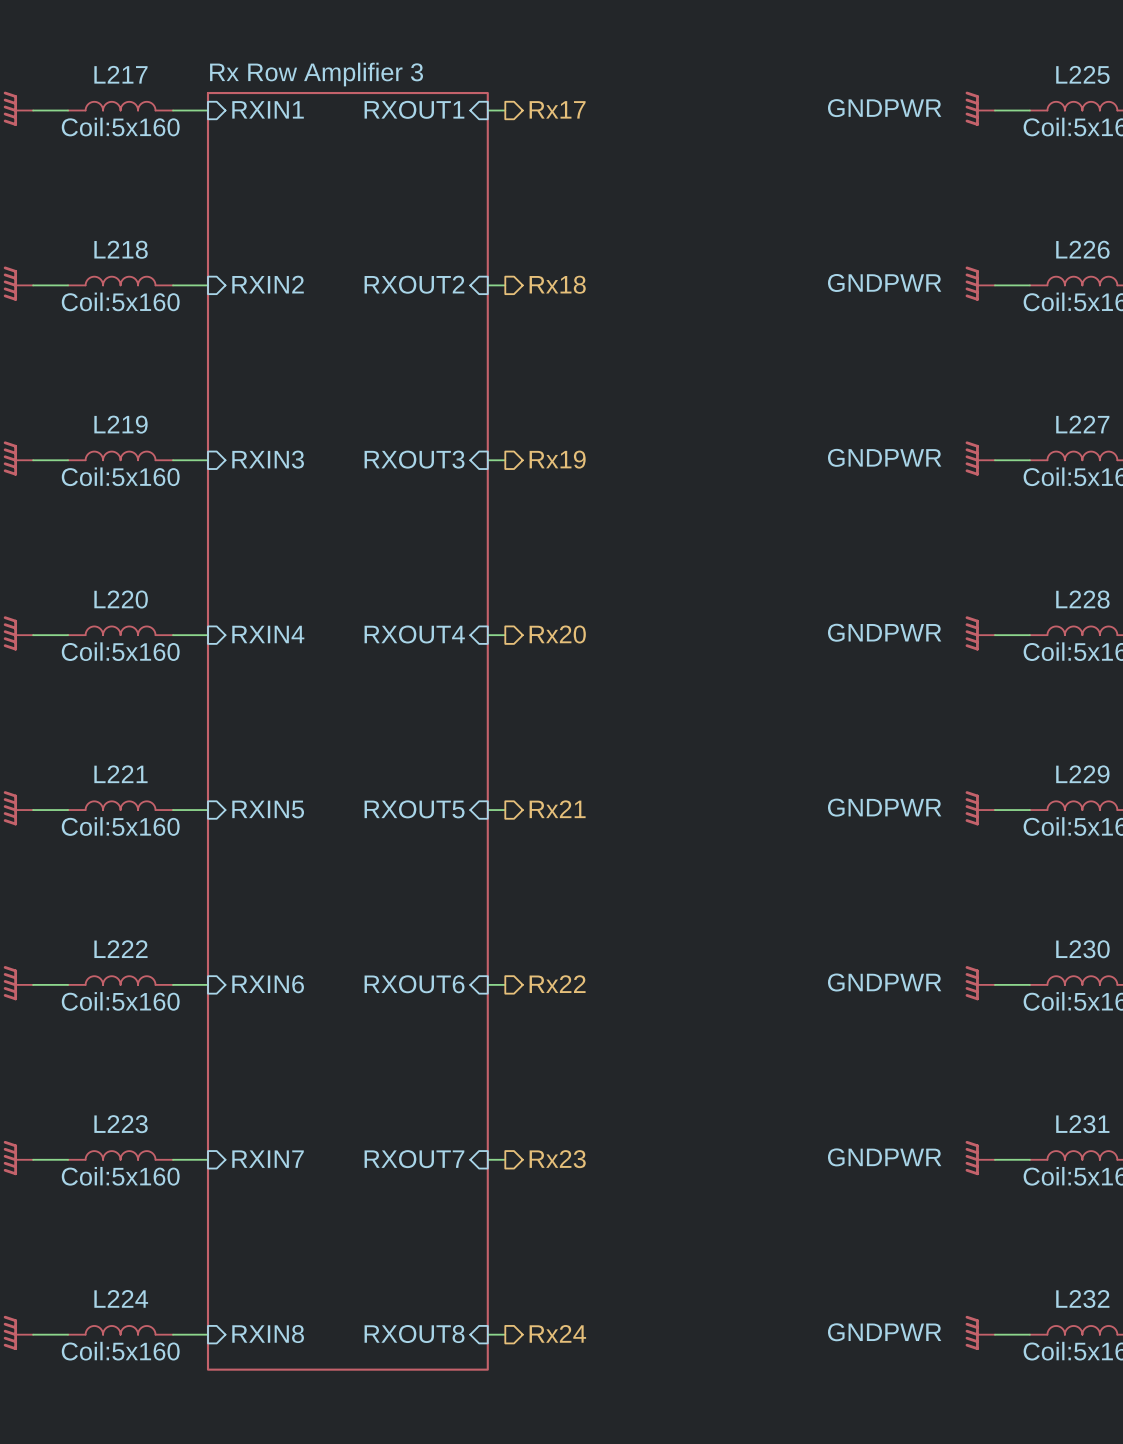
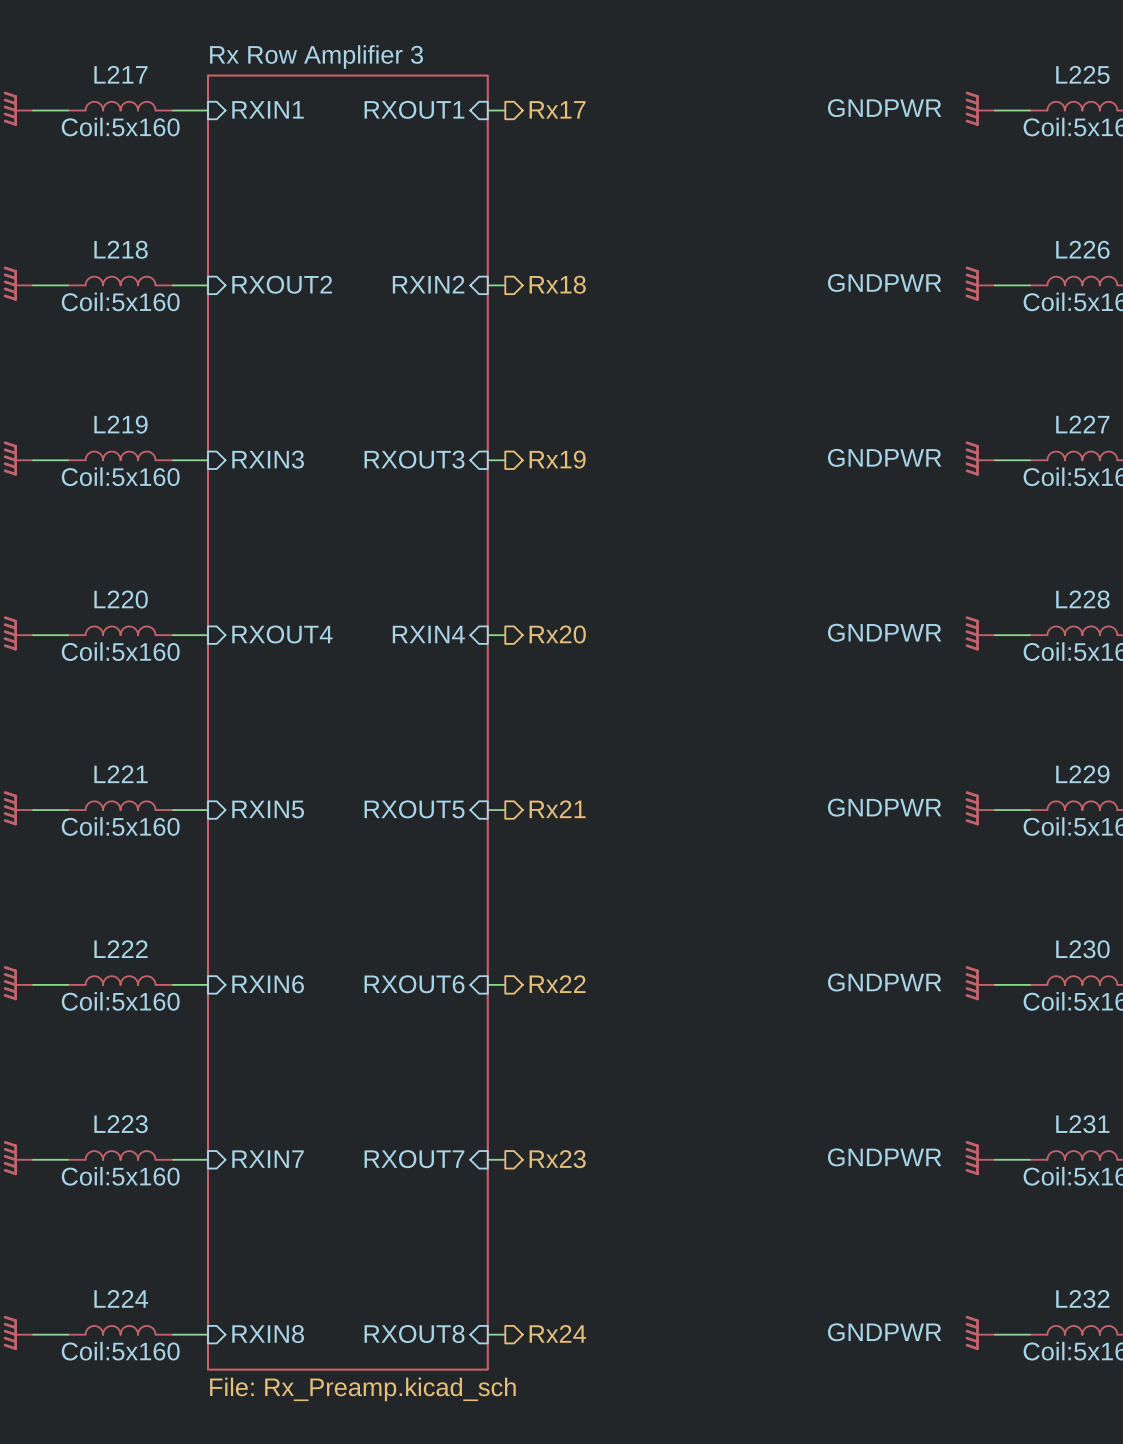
sheet Rx Row Amplifier 3 shape: [206, 91, 489, 1371] -> [206, 74, 489, 1371]
sheet pin: RXIN2 (268, 284) -> RXOUT2 (282, 284)
sheet pin: RXOUT2 (414, 284) -> RXIN2 (428, 284)
sheet pin: RXIN4 (268, 634) -> RXOUT4 (282, 634)
sheet pin: RXOUT4 (414, 634) -> RXIN4 (428, 634)
sheet Rx Row Amplifier 3 value: none -> File: Rx_Preamp.kicad_sch (362, 1389)

